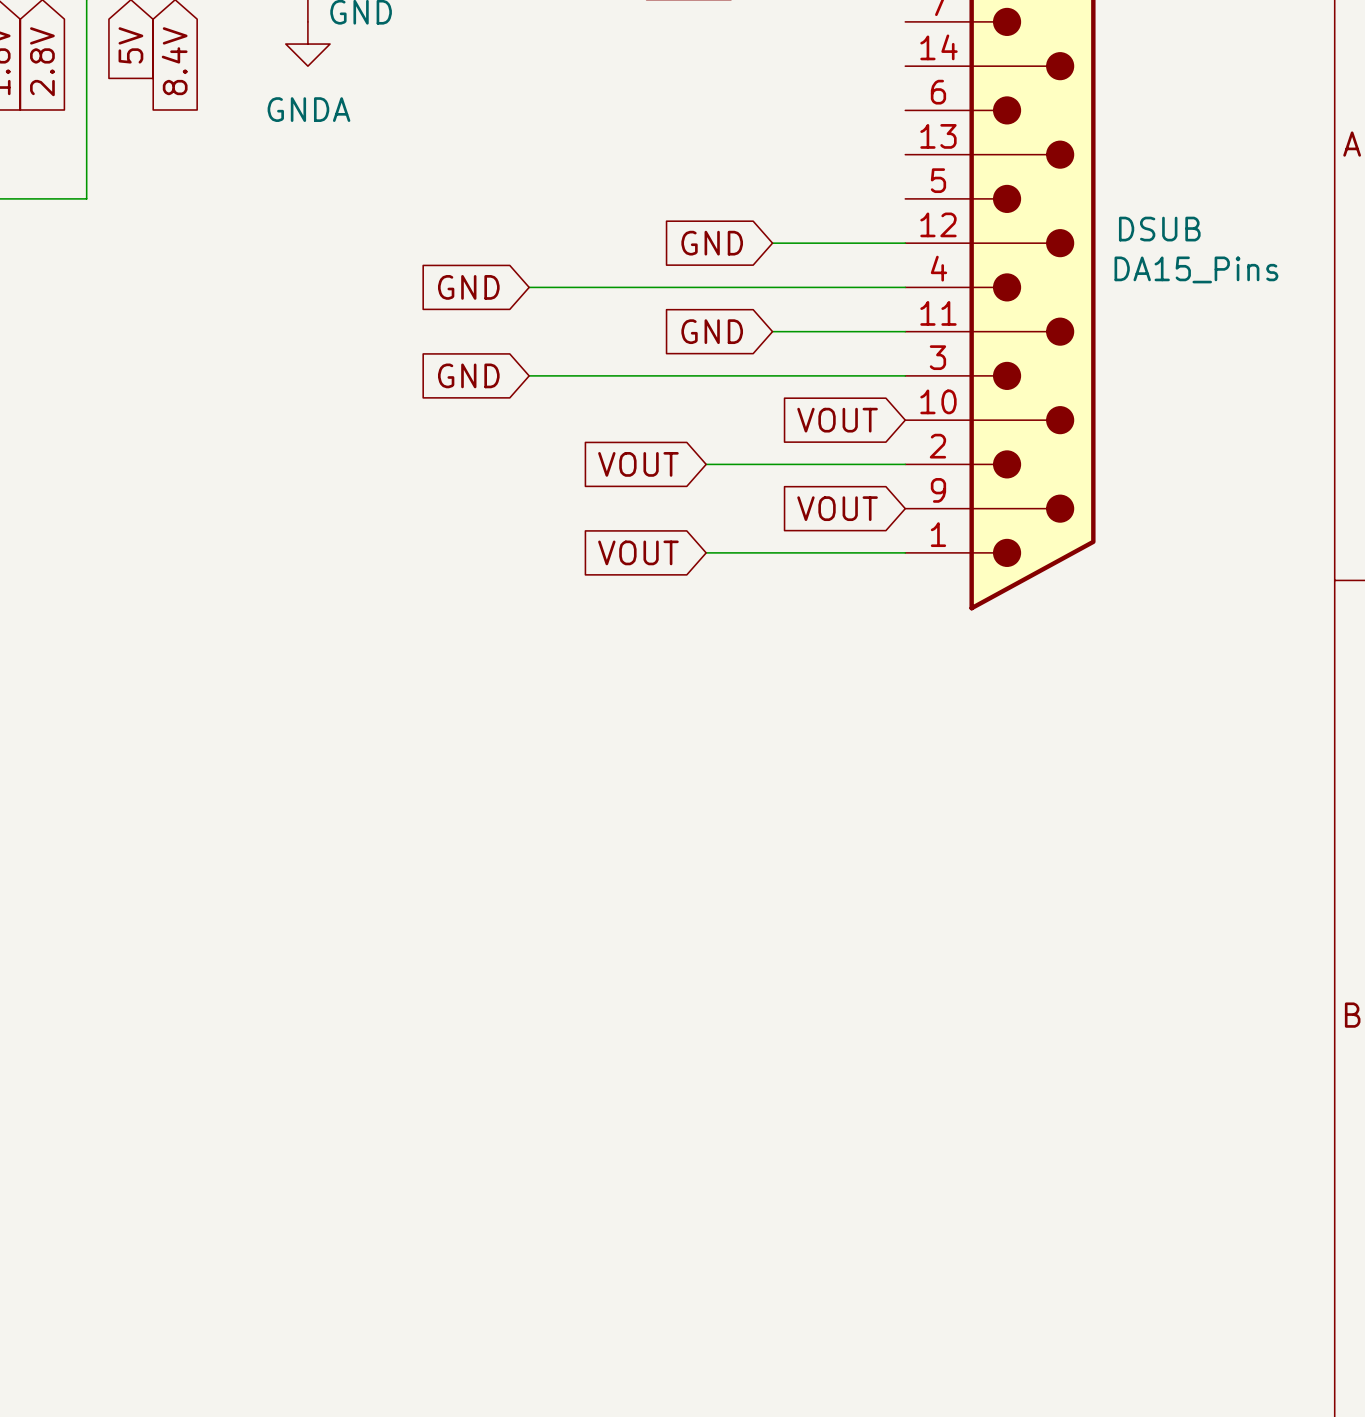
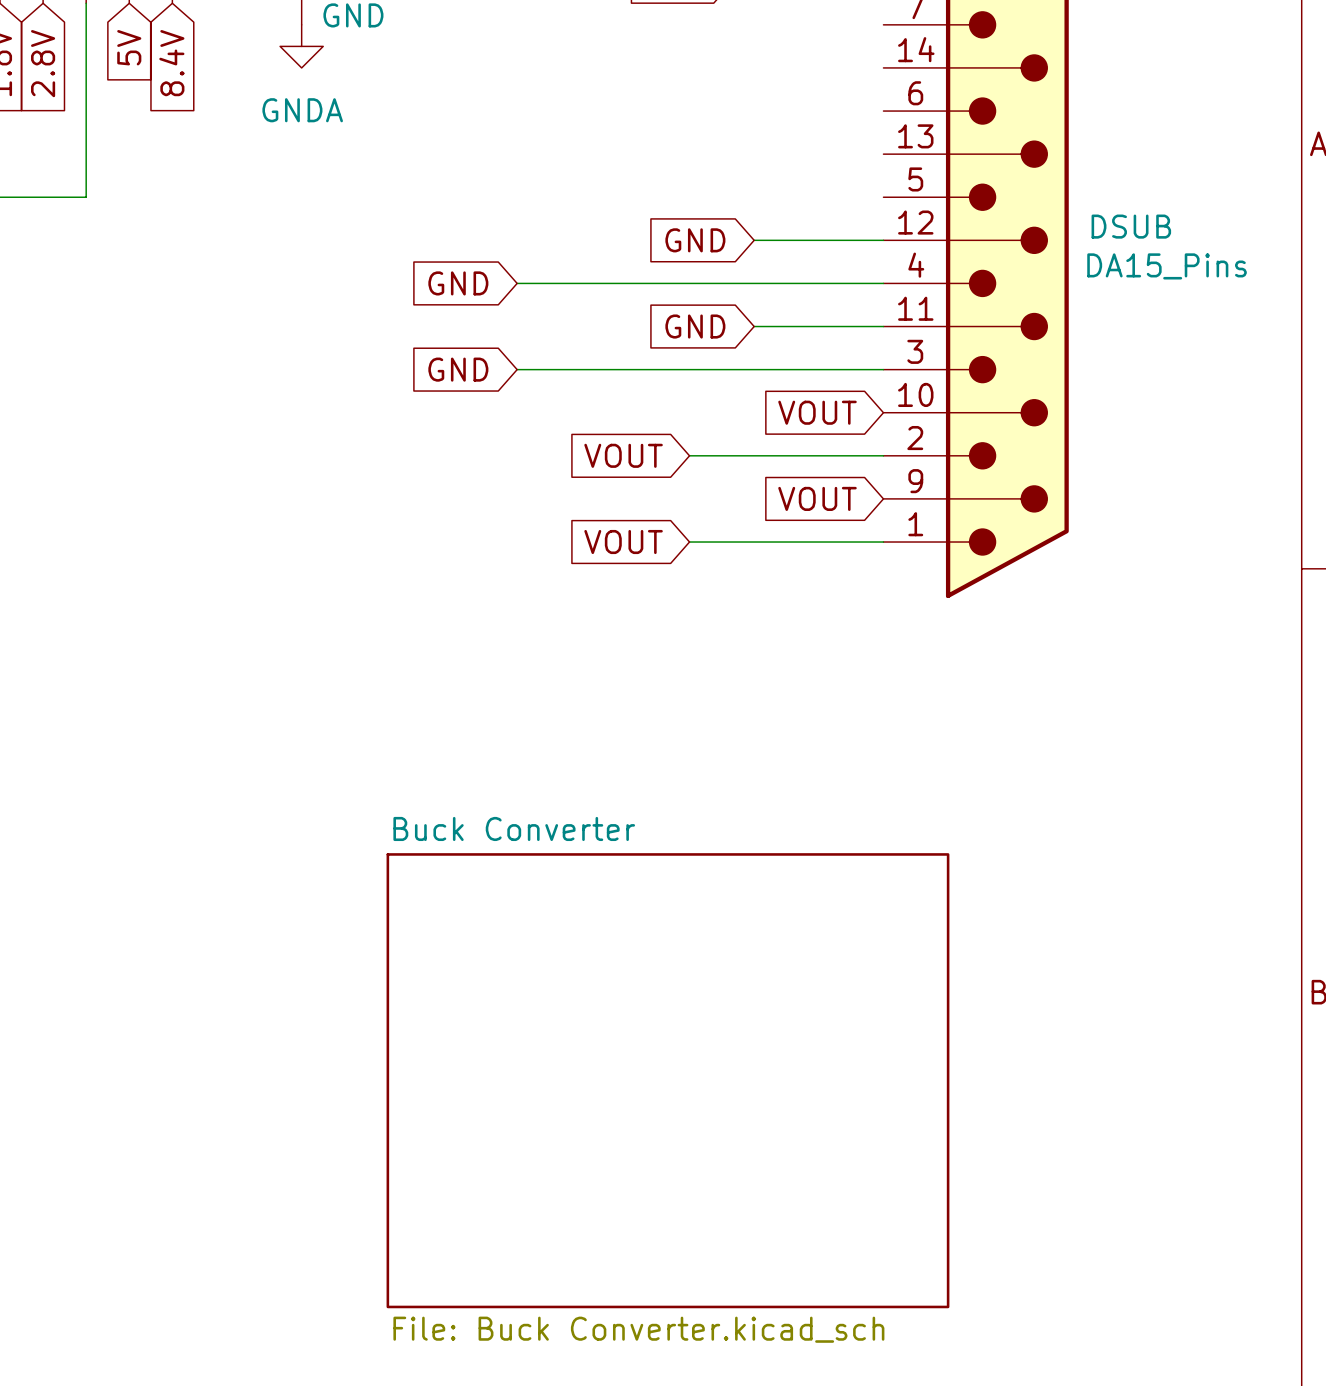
sheet Buck Converter: none -> File: Buck Converter.kicad_sch (667, 1080)

